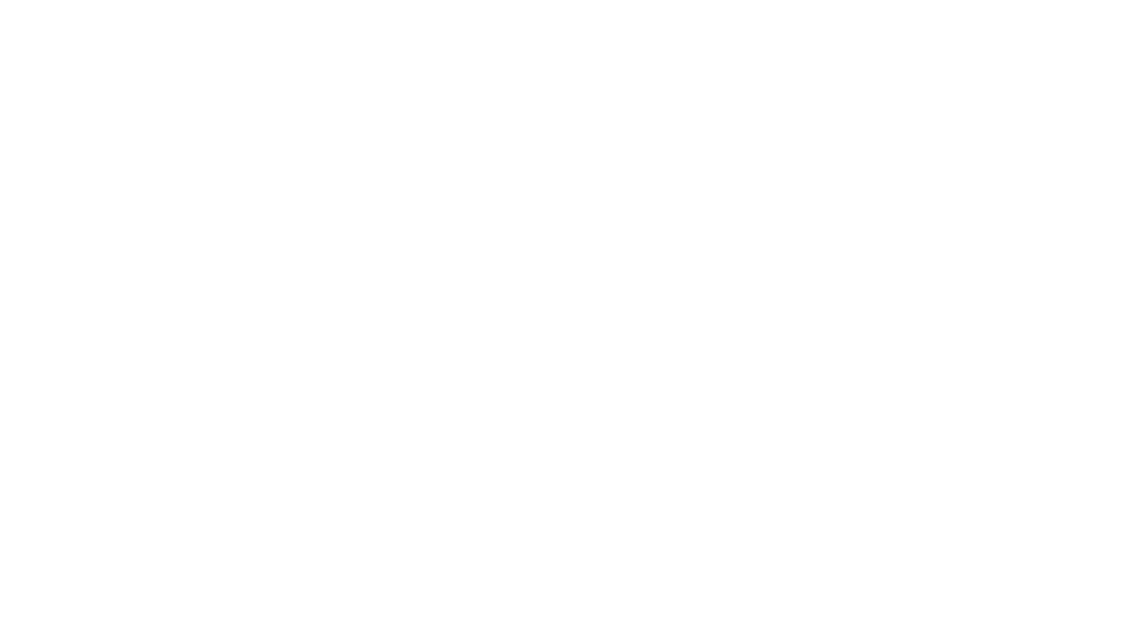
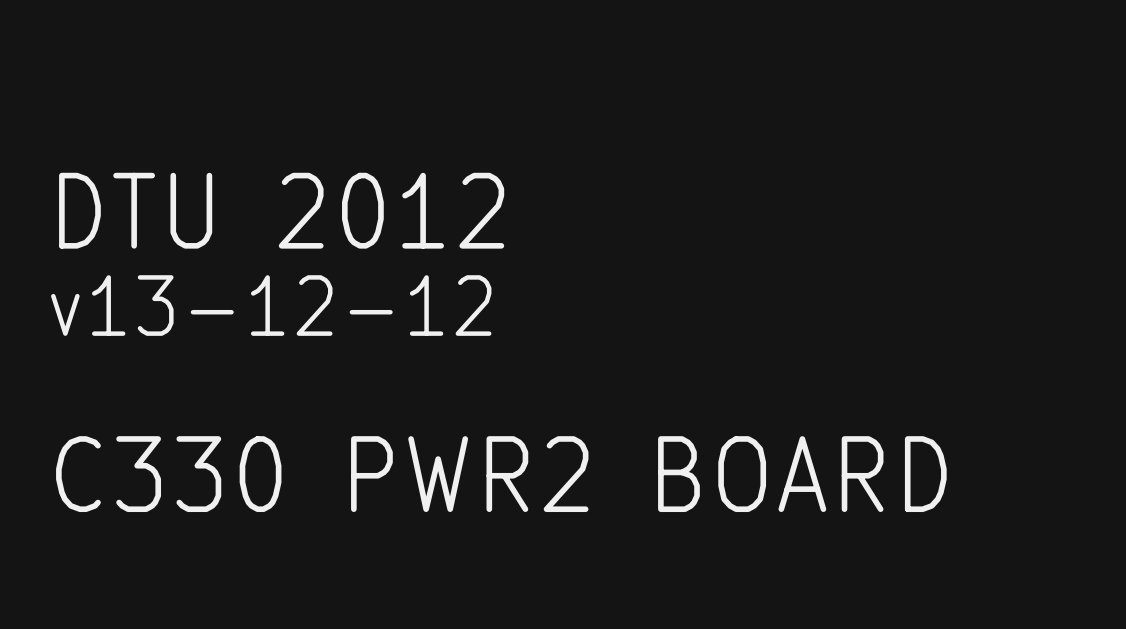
text: none -> DTU 2012 (281, 210)
text: none -> v13-12-12 (271, 305)
text: none -> C330 PWR2 BOARD (501, 474)

